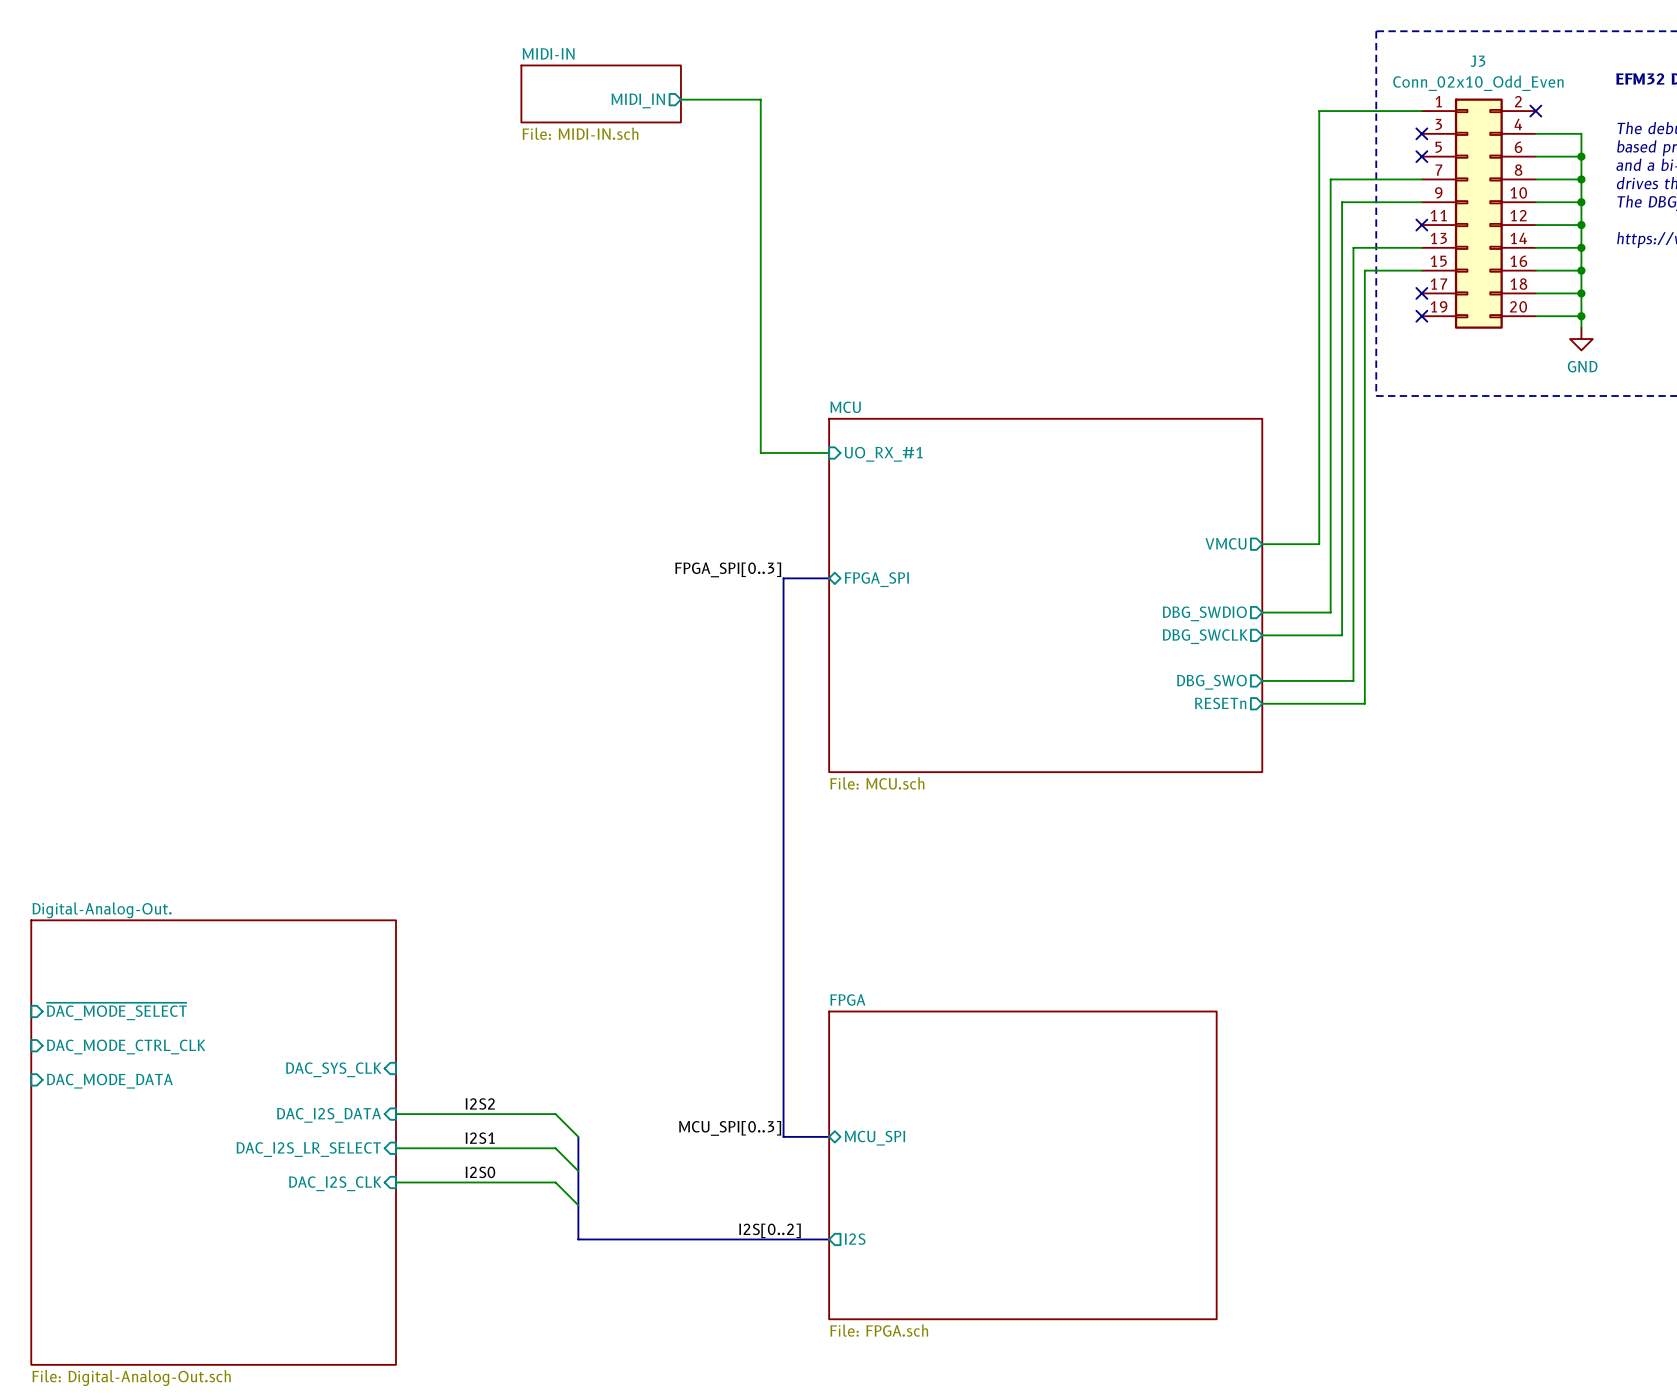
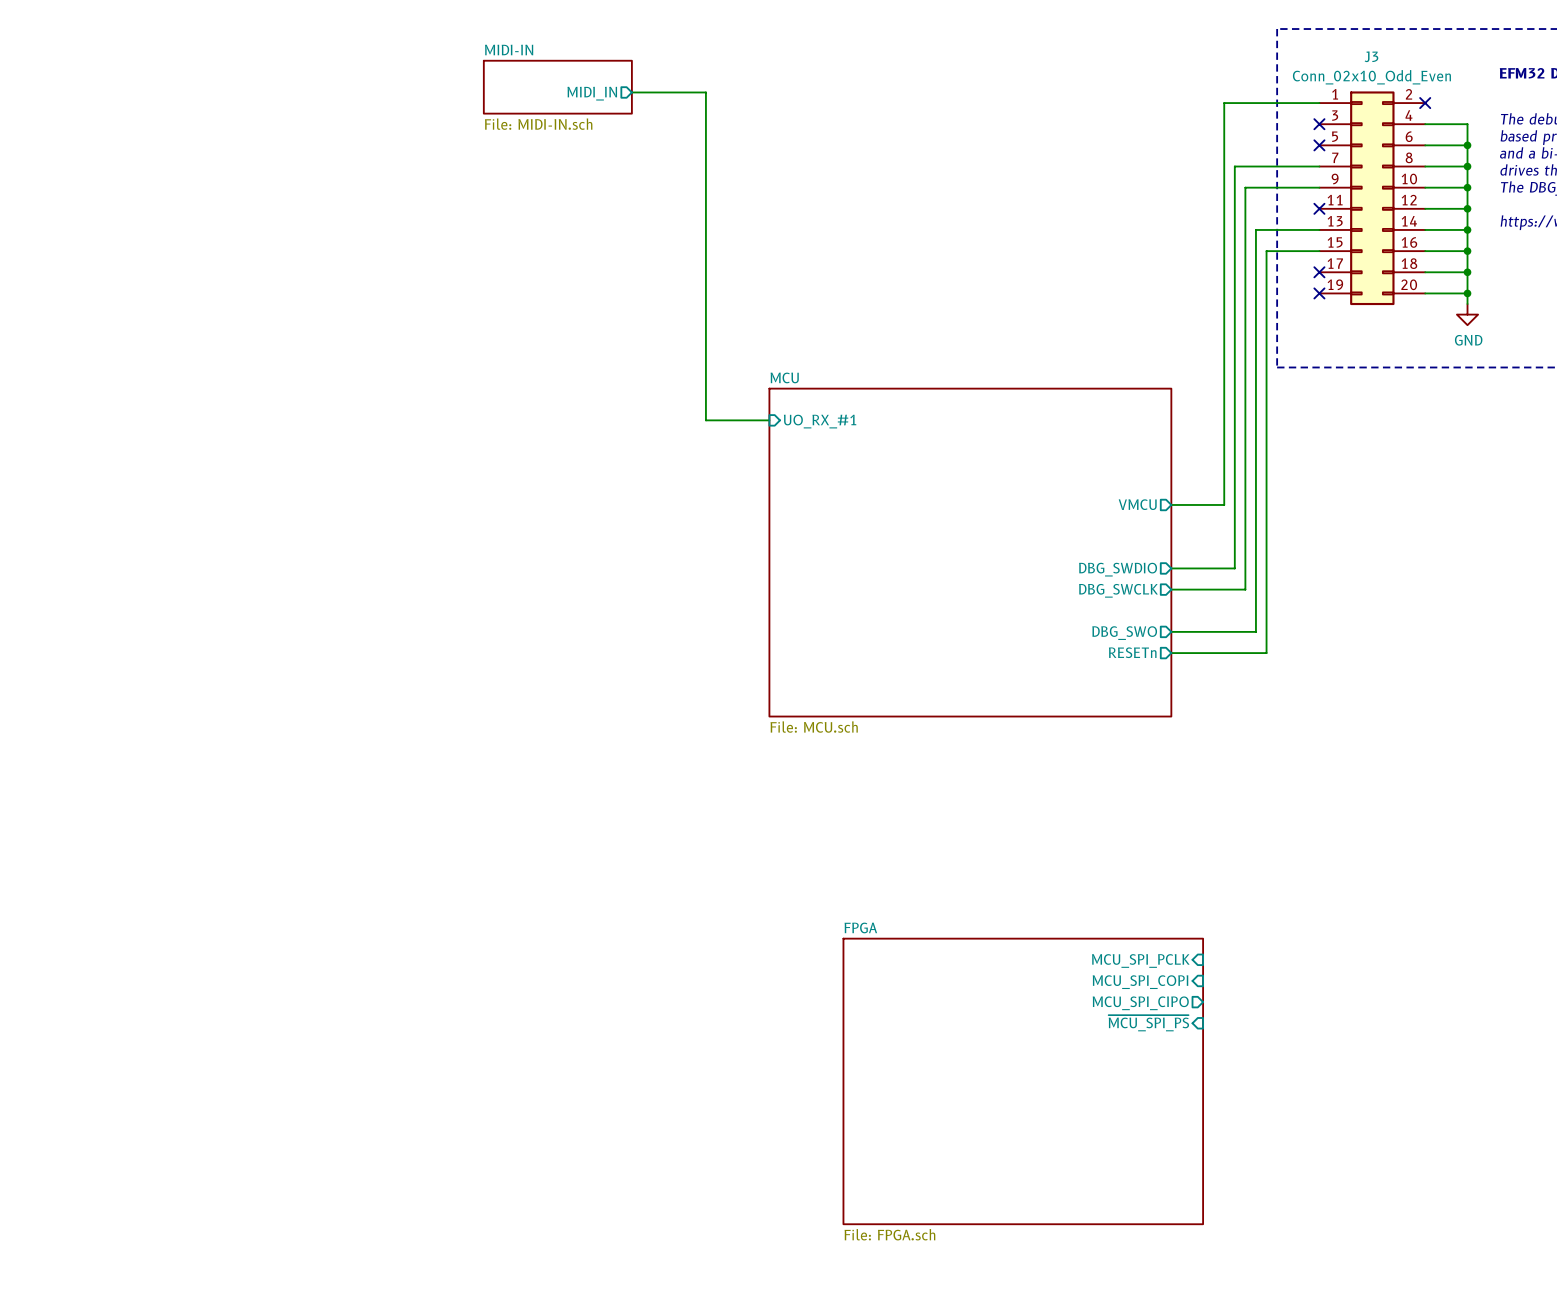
label: FPGA_SPI[0..3] (728, 569) -> none
bus: (829, 578) (783, 578) (783, 1136) (829, 1136) -> none
sheet pin: FPGA_SPI (876, 579) -> none
sheet pin: ~{DAC_MODE_SELECT} (116, 1011) -> none
sheet pin: none -> MCU_SPI_PCLK (1140, 960)
sheet pin: DAC_MODE_CTRL_CLK (126, 1046) -> none
sheet pin: none -> MCU_SPI_COPI (1140, 982)
sheet pin: DAC_SYS_CLK (333, 1069) -> none
sheet pin: DAC_MODE_DATA (109, 1081) -> none
sheet pin: none -> MCU_SPI_CIPO (1140, 1003)
sheet pin: none -> ~{MCU_SPI_PS} (1148, 1023)
label: I2S2 (480, 1103) -> none
wire: (396, 1114) (555, 1114) (578, 1136) -> none
sheet pin: DAC_I2S_DATA (329, 1115) -> none
label: MCU_SPI[0..3] (730, 1128) -> none
bus: (578, 1136) (578, 1239) (829, 1239) -> none
label: I2S1 (480, 1138) -> none
sheet pin: MCU_SPI (875, 1138) -> none
sheet Digital-Analog-Out.: File: Digital-Analog-Out.sch (213, 1142) -> none
wire: (396, 1148) (555, 1148) (578, 1171) -> none
sheet pin: DAC_I2S_LR_SELECT (308, 1149) -> none
sheet FPGA position: (1022, 1165) -> (1023, 1081)
label: I2S0 (480, 1172) -> none
wire: (396, 1182) (555, 1182) (578, 1205) -> none
sheet pin: DAC_I2S_CLK (335, 1183) -> none
label: I2S[0..2] (770, 1230) -> none
sheet pin: I2S (855, 1239) -> none

